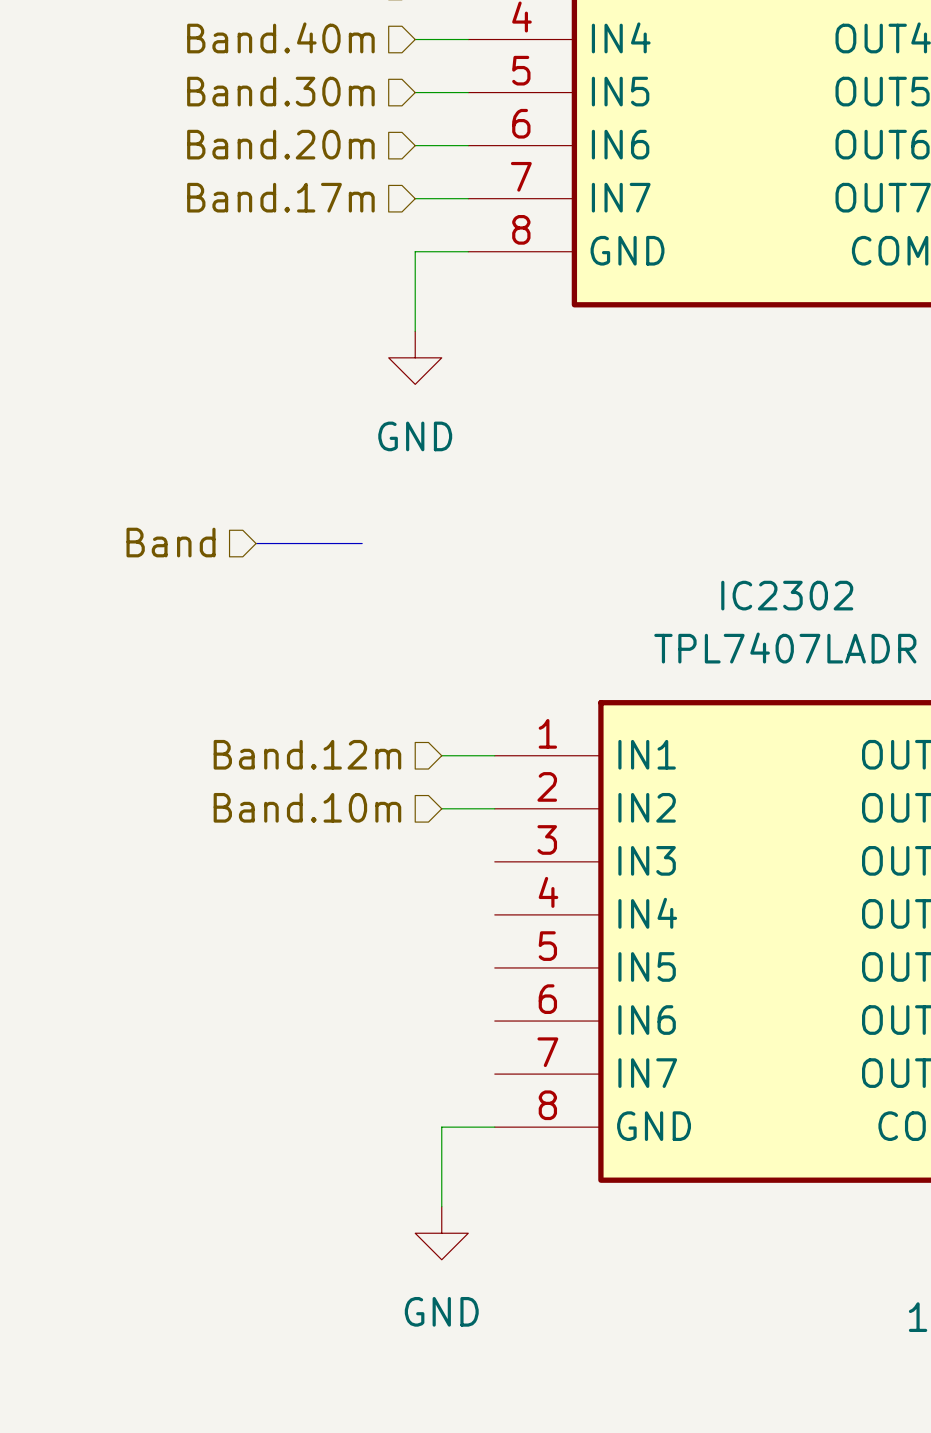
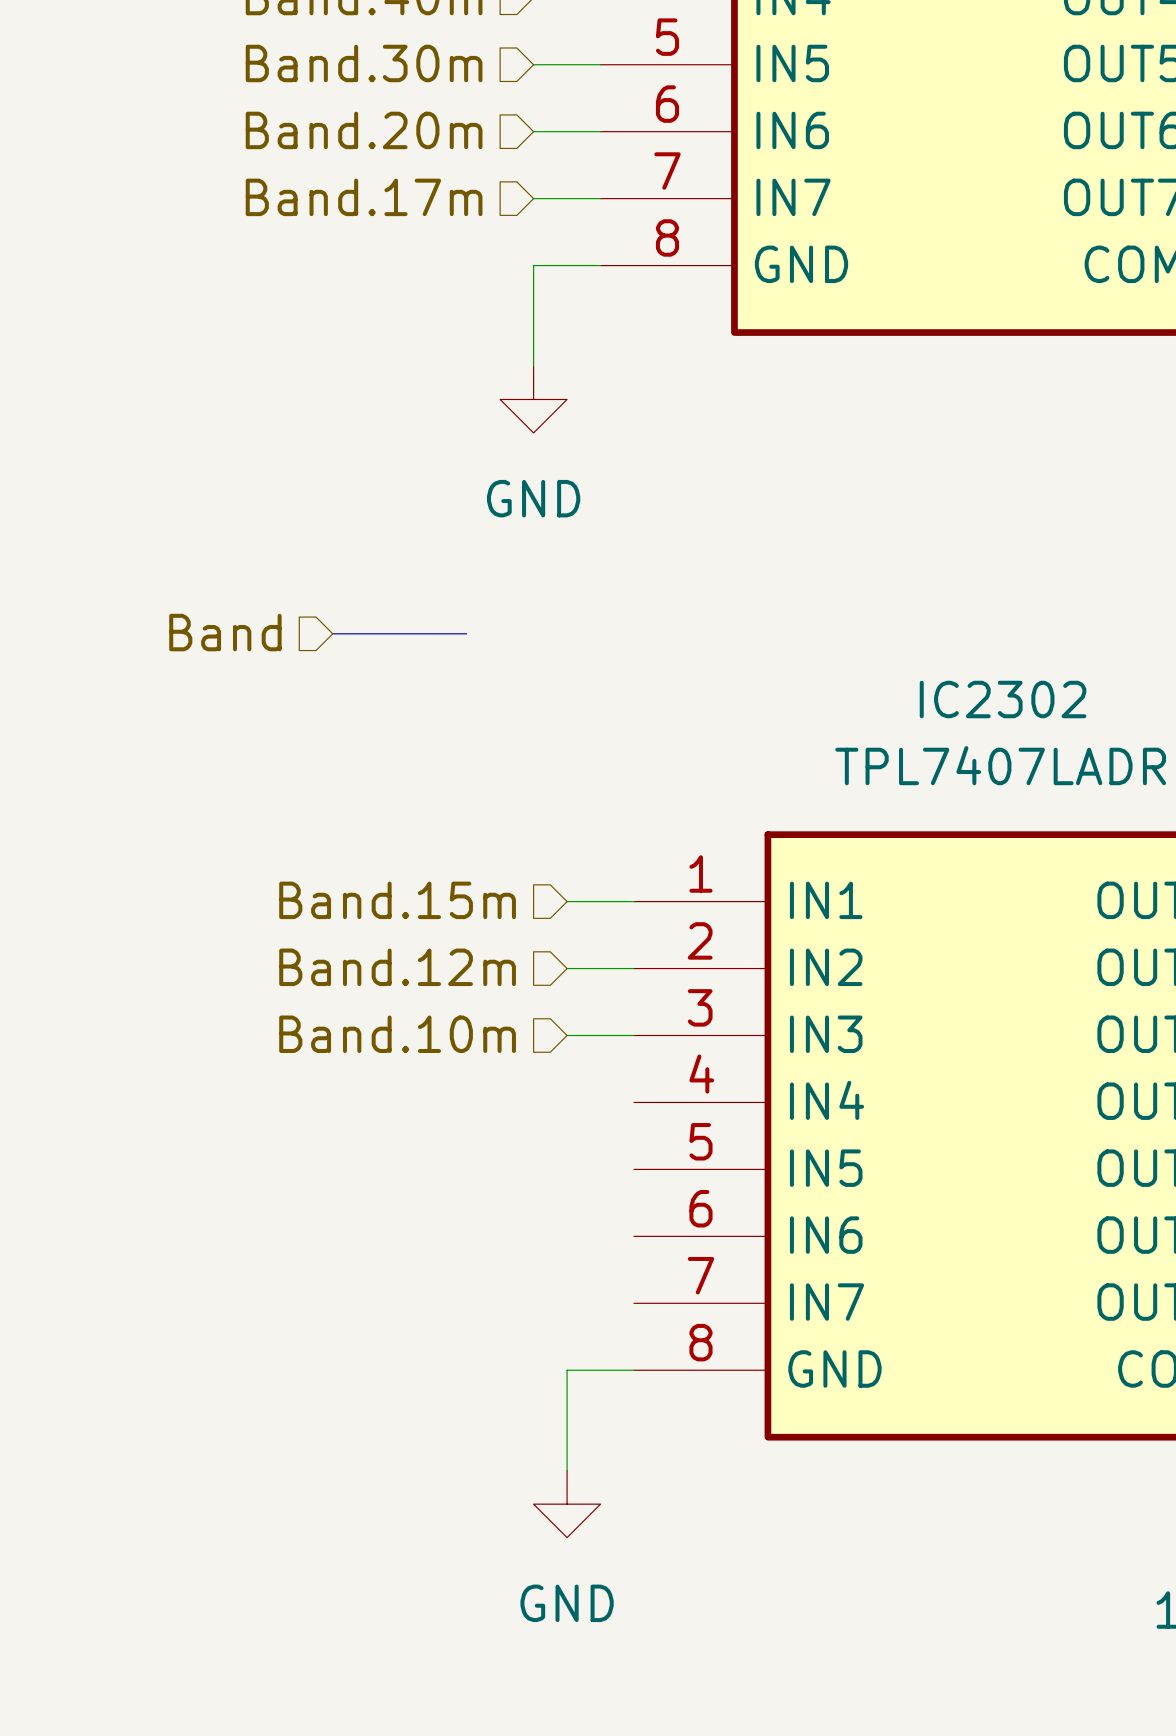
hierarchical label: Band.12m (307, 754) -> Band.15m (397, 900)
hierarchical label: Band.10m (307, 807) -> Band.12m (397, 967)
hierarchical label: none -> Band.10m (397, 1034)
wire: none -> (567, 1035) (634, 1035)

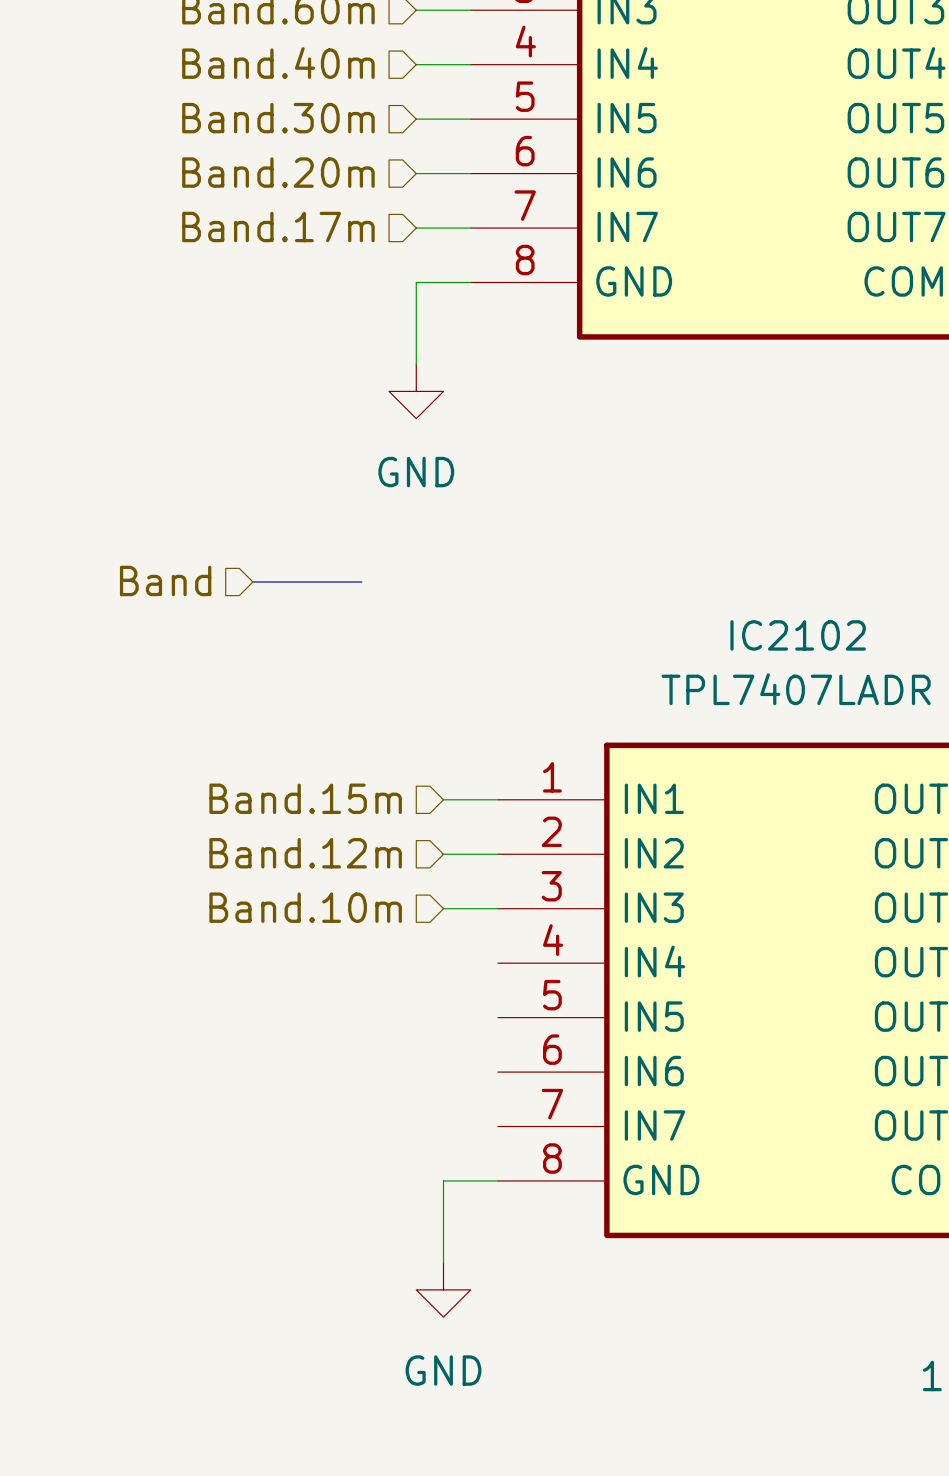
IC2302 name: IC2302 (1003, 699) -> IC2102 (798, 635)

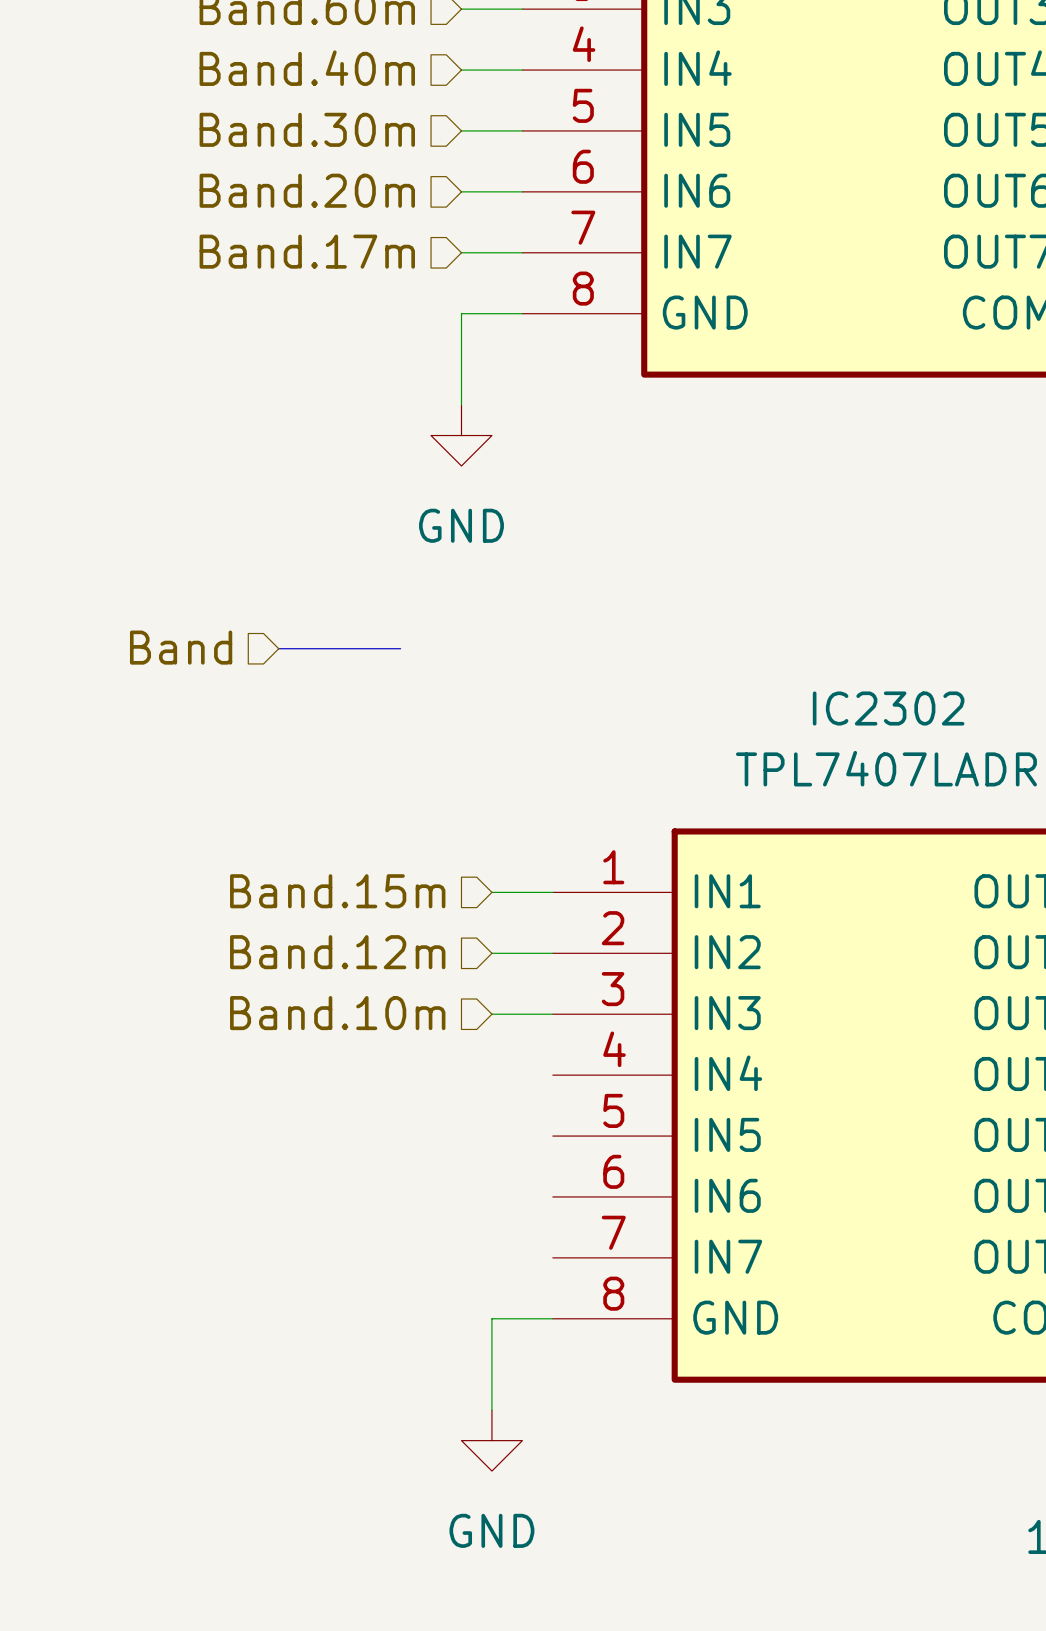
IC2102 name: IC2102 (798, 635) -> IC2302 (888, 708)

